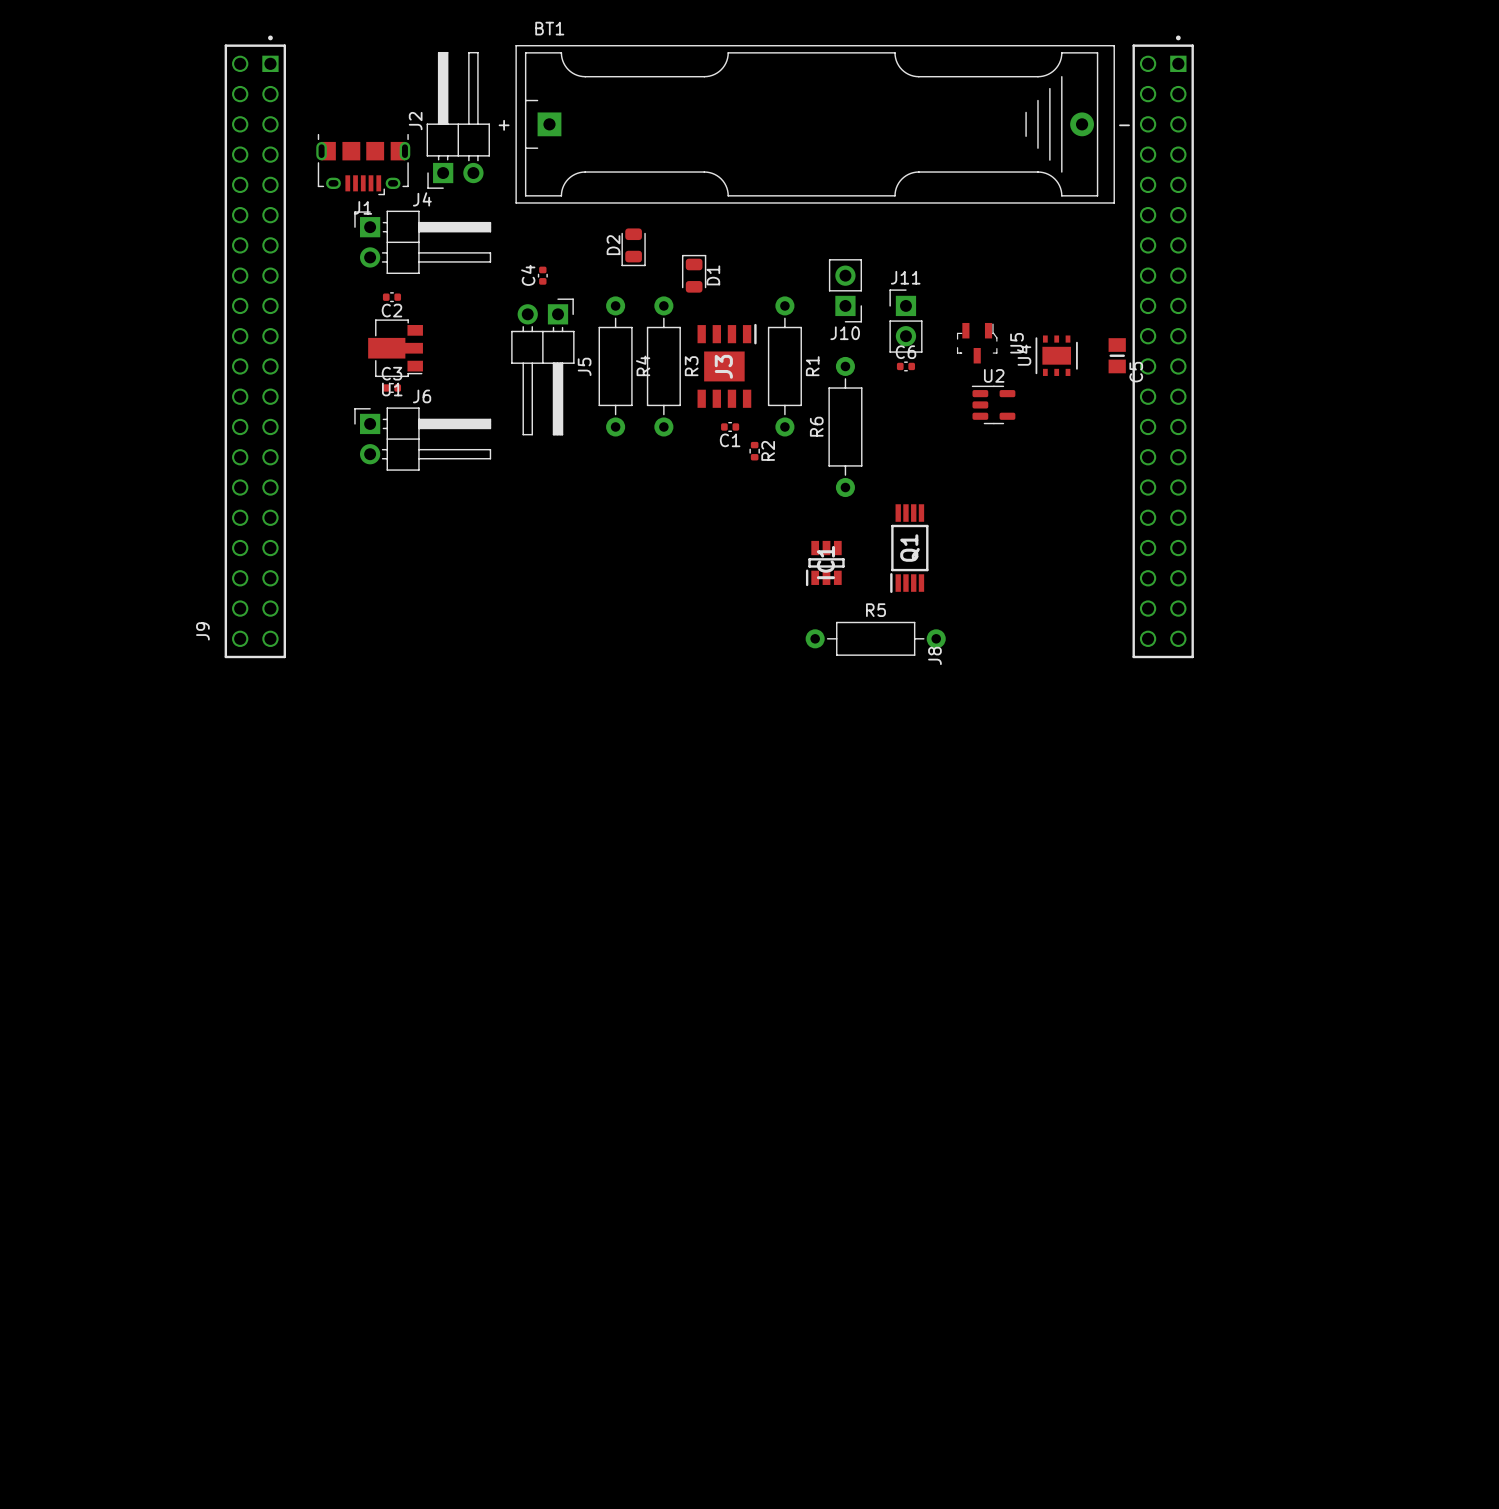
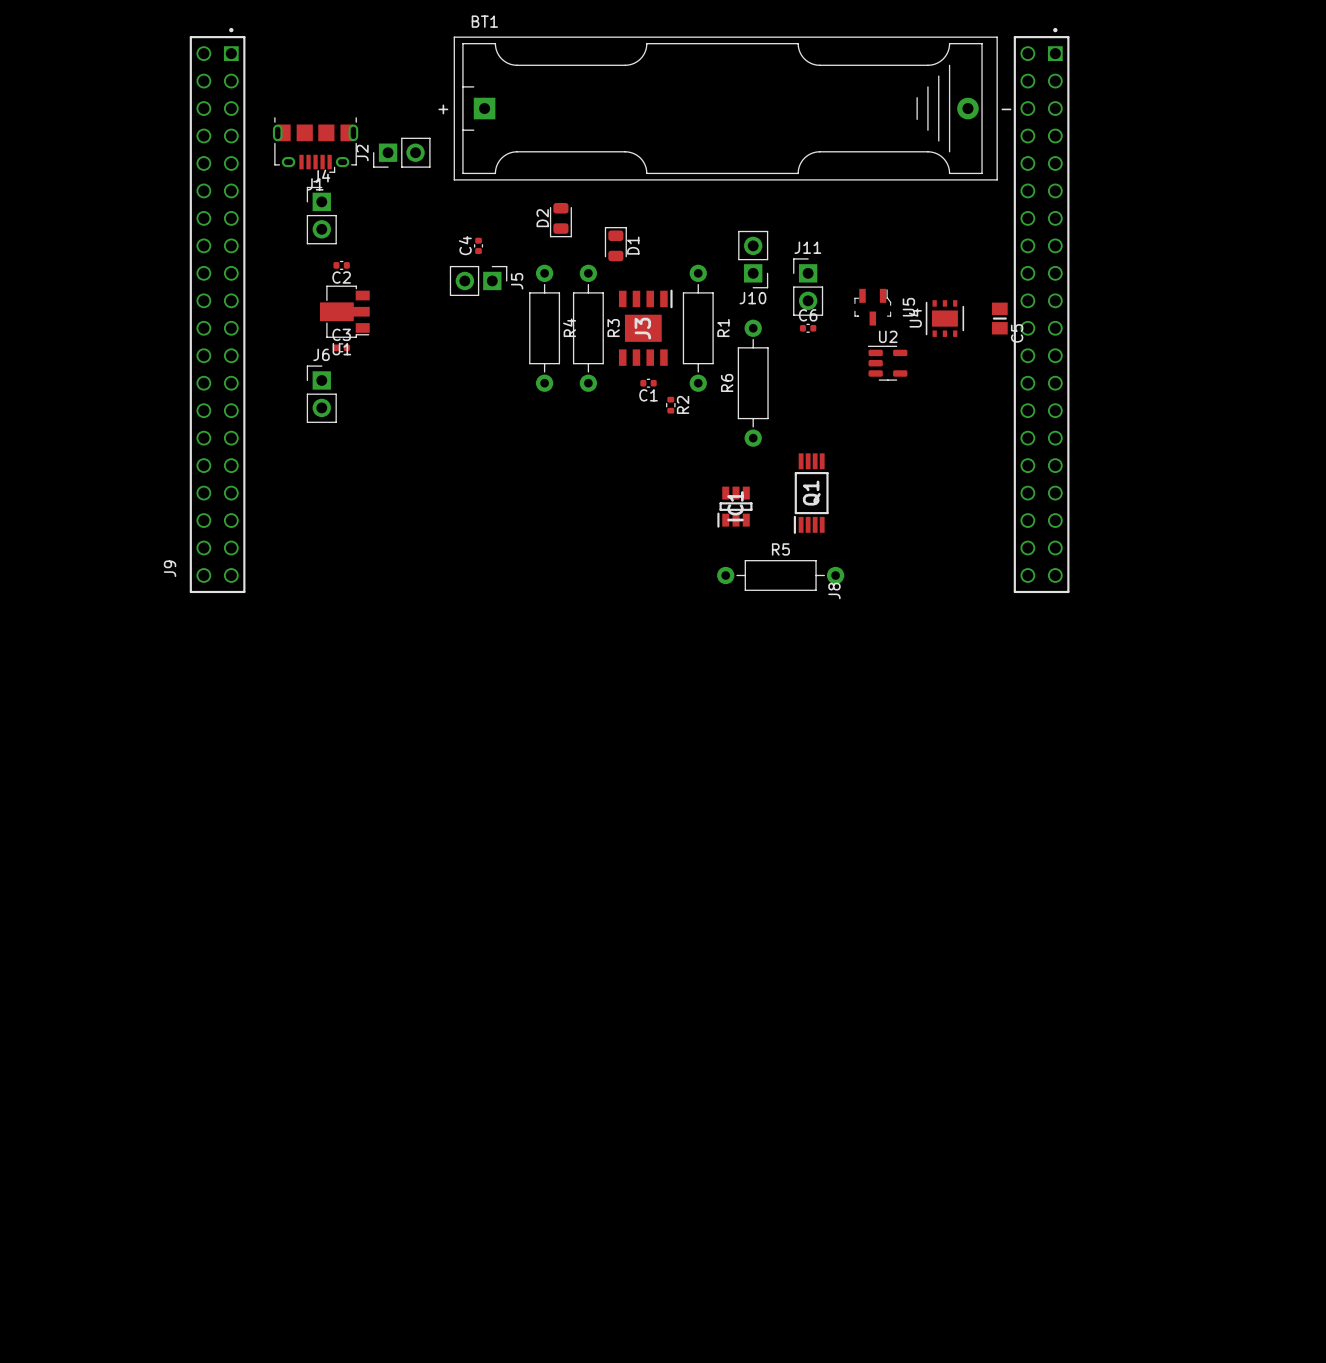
J2 footprint: [426, 51, 490, 189] -> [373, 137, 431, 168]
J4 footprint: [354, 210, 492, 275] -> [306, 186, 337, 245]
J5 footprint: [511, 298, 575, 436] -> [449, 265, 508, 297]
J6 footprint: [354, 407, 492, 471] -> [306, 365, 337, 423]

